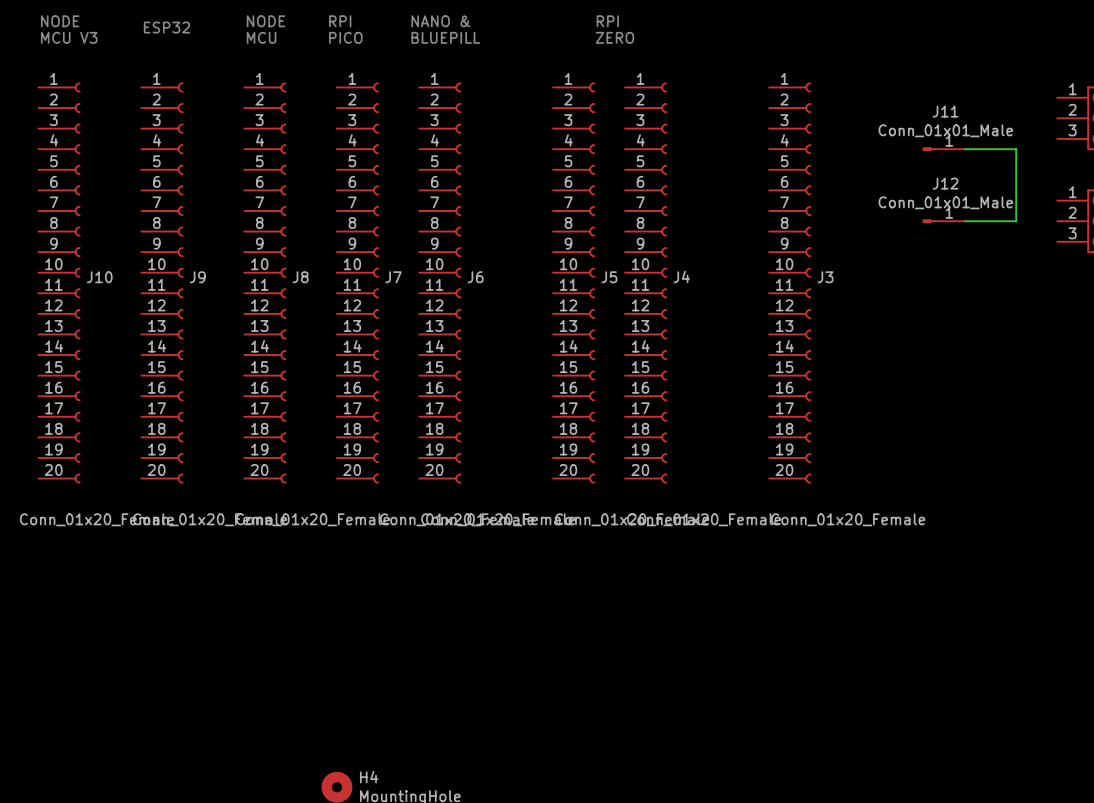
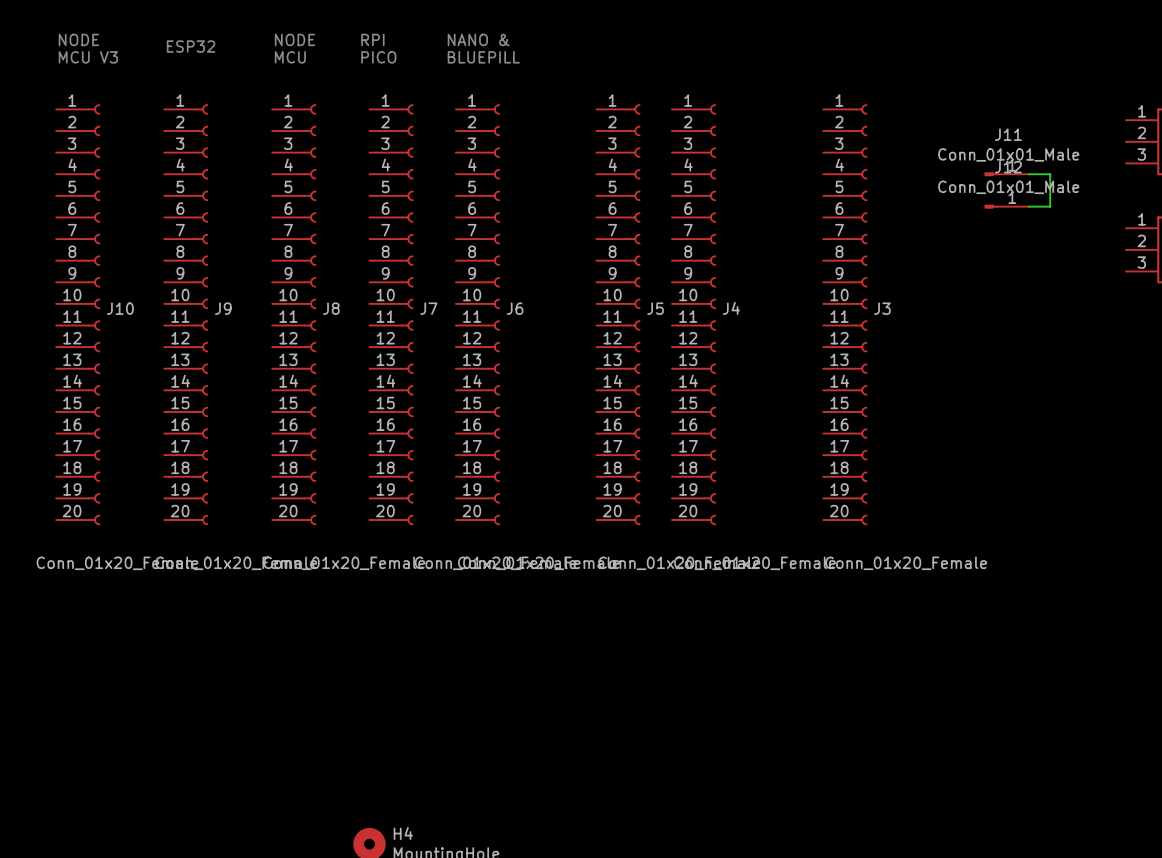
text: RPI (607, 21) -> none
text: ZERO (614, 37) -> none
wire: (985, 149) (1016, 149) (1016, 221) (964, 221) -> (1050, 174) (1050, 206) (1028, 206)
J12 position: (943, 221) -> (1006, 206)

